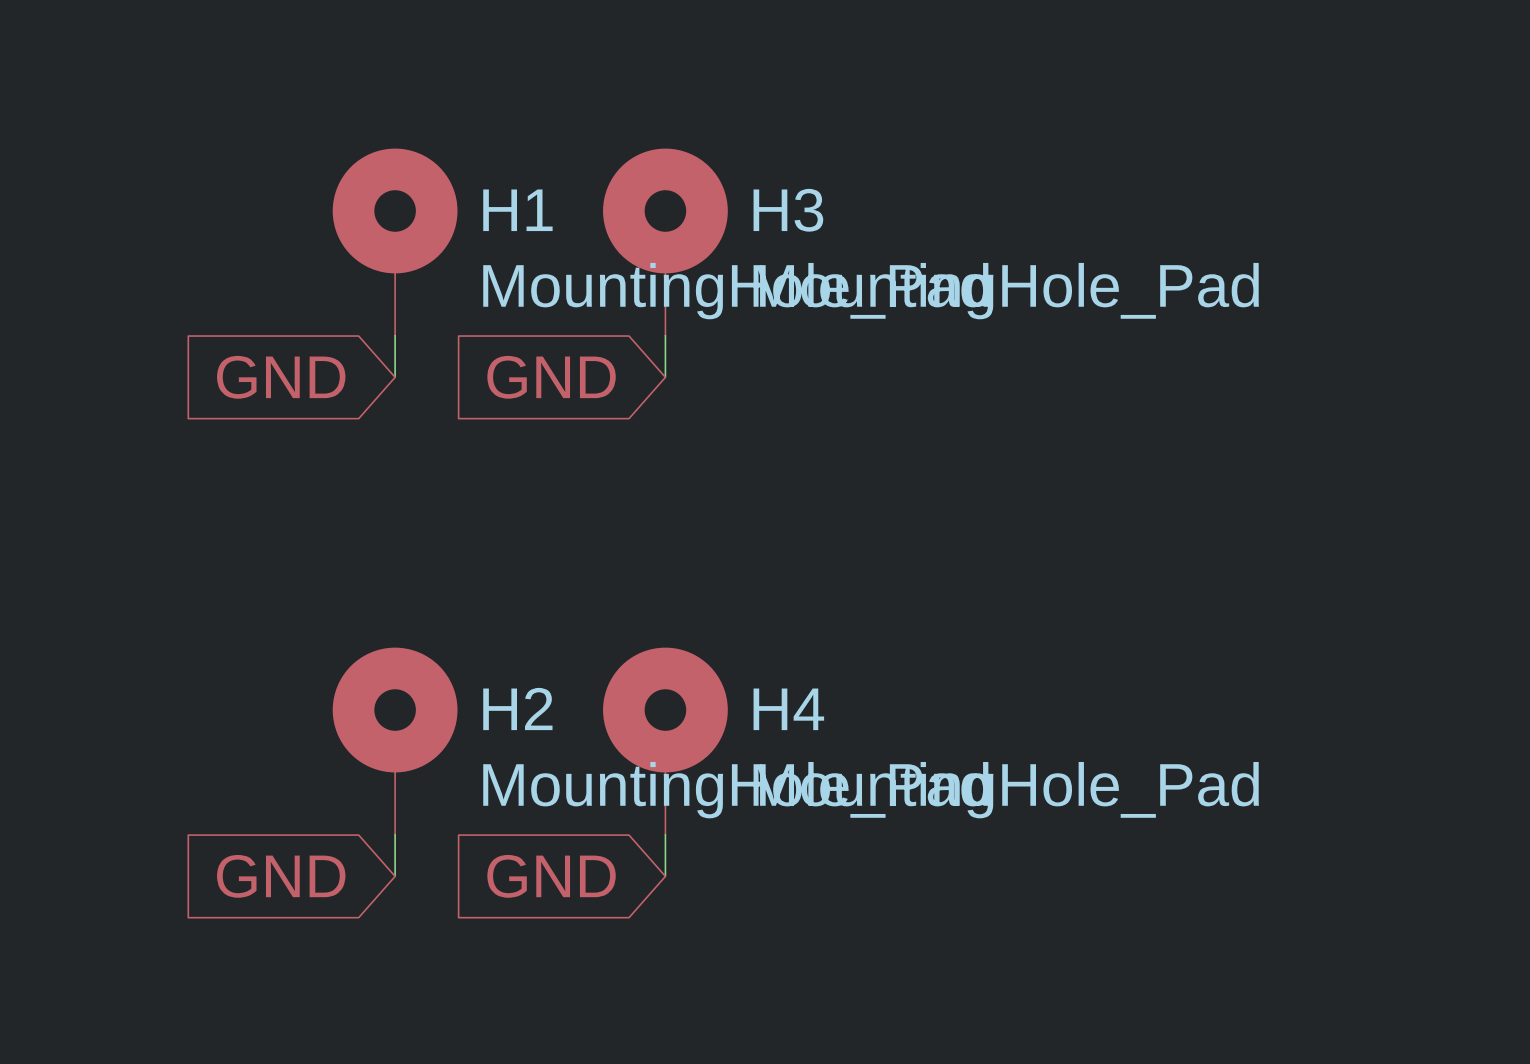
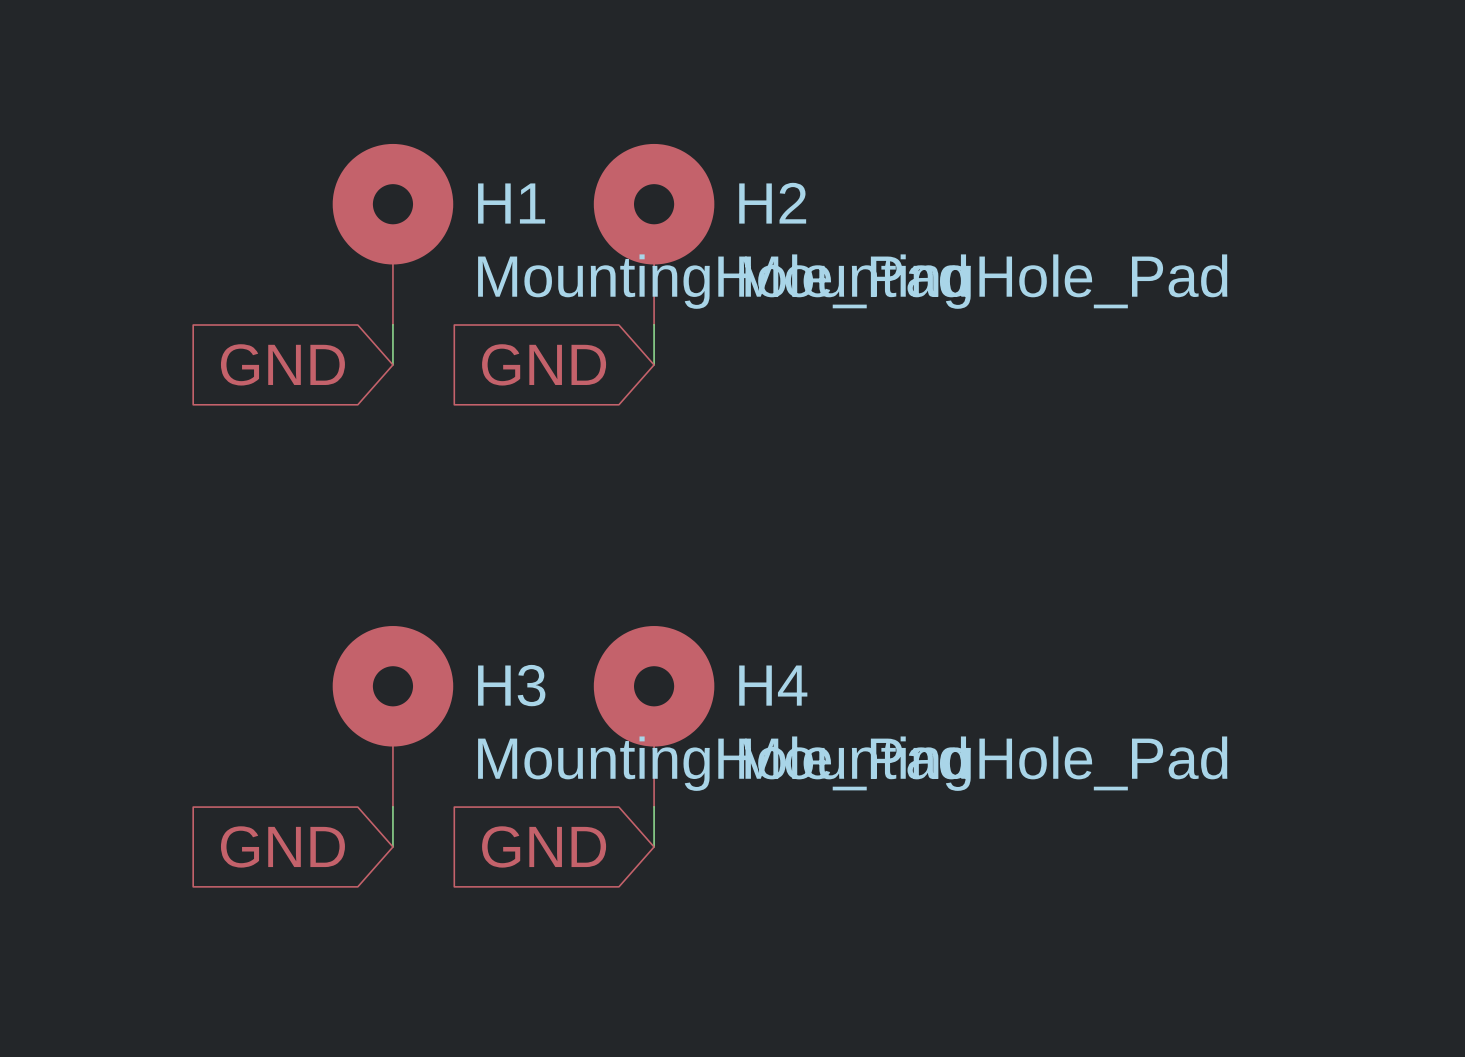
H3 name: H3 (788, 210) -> H2 (772, 203)
H2 name: H2 (517, 708) -> H3 (511, 685)

